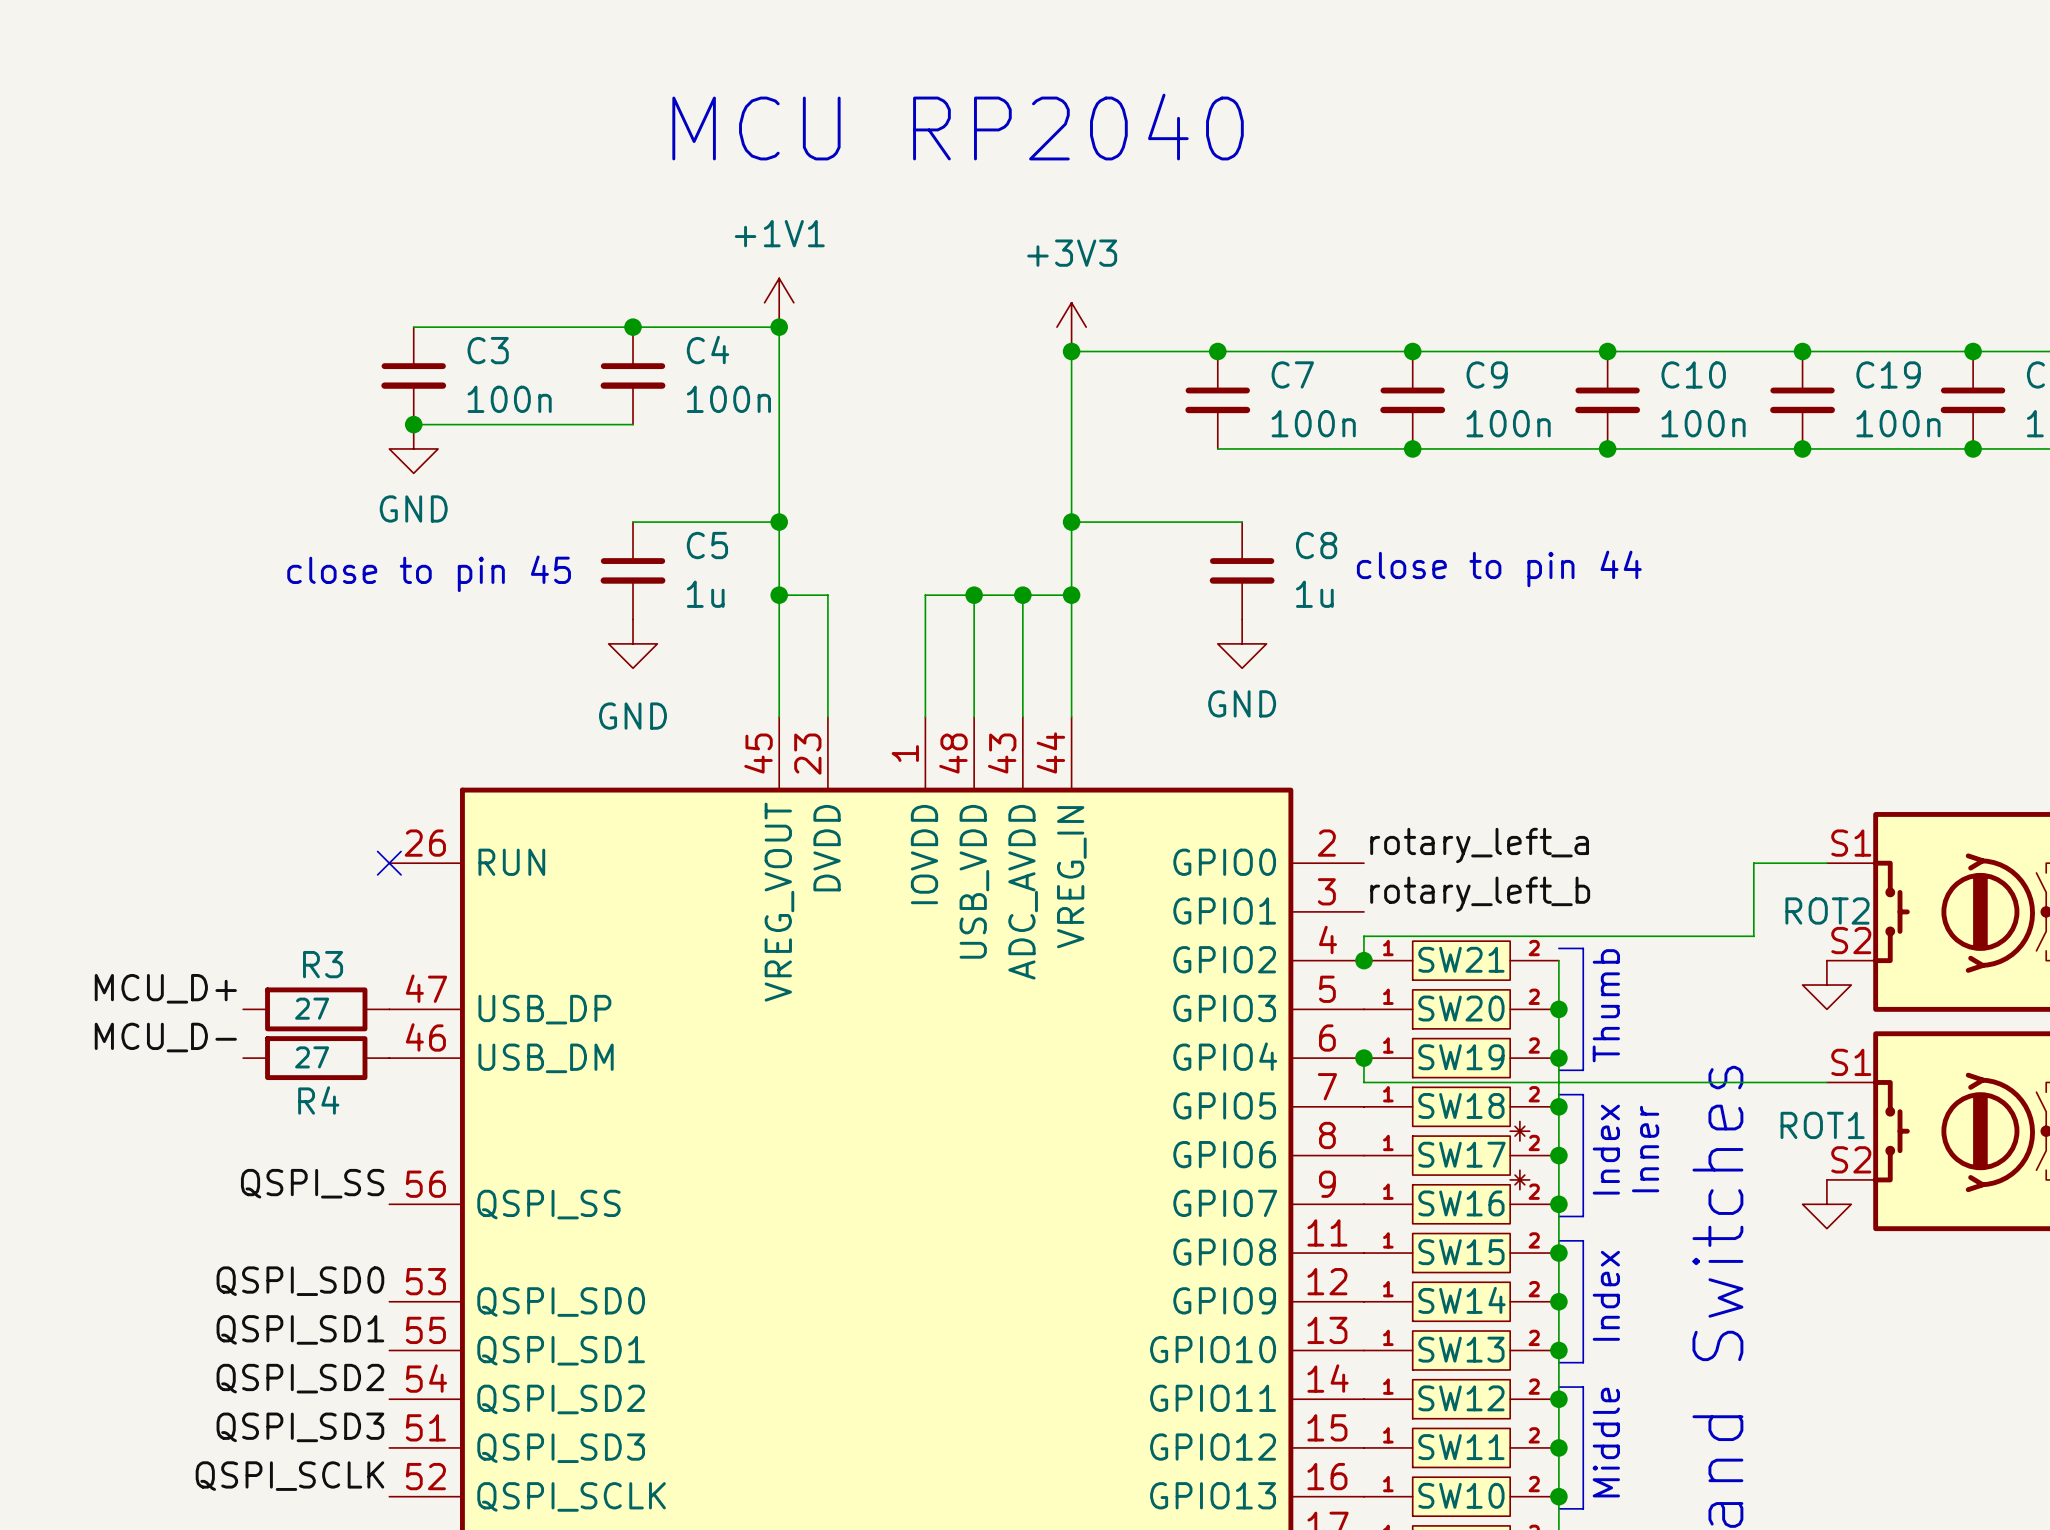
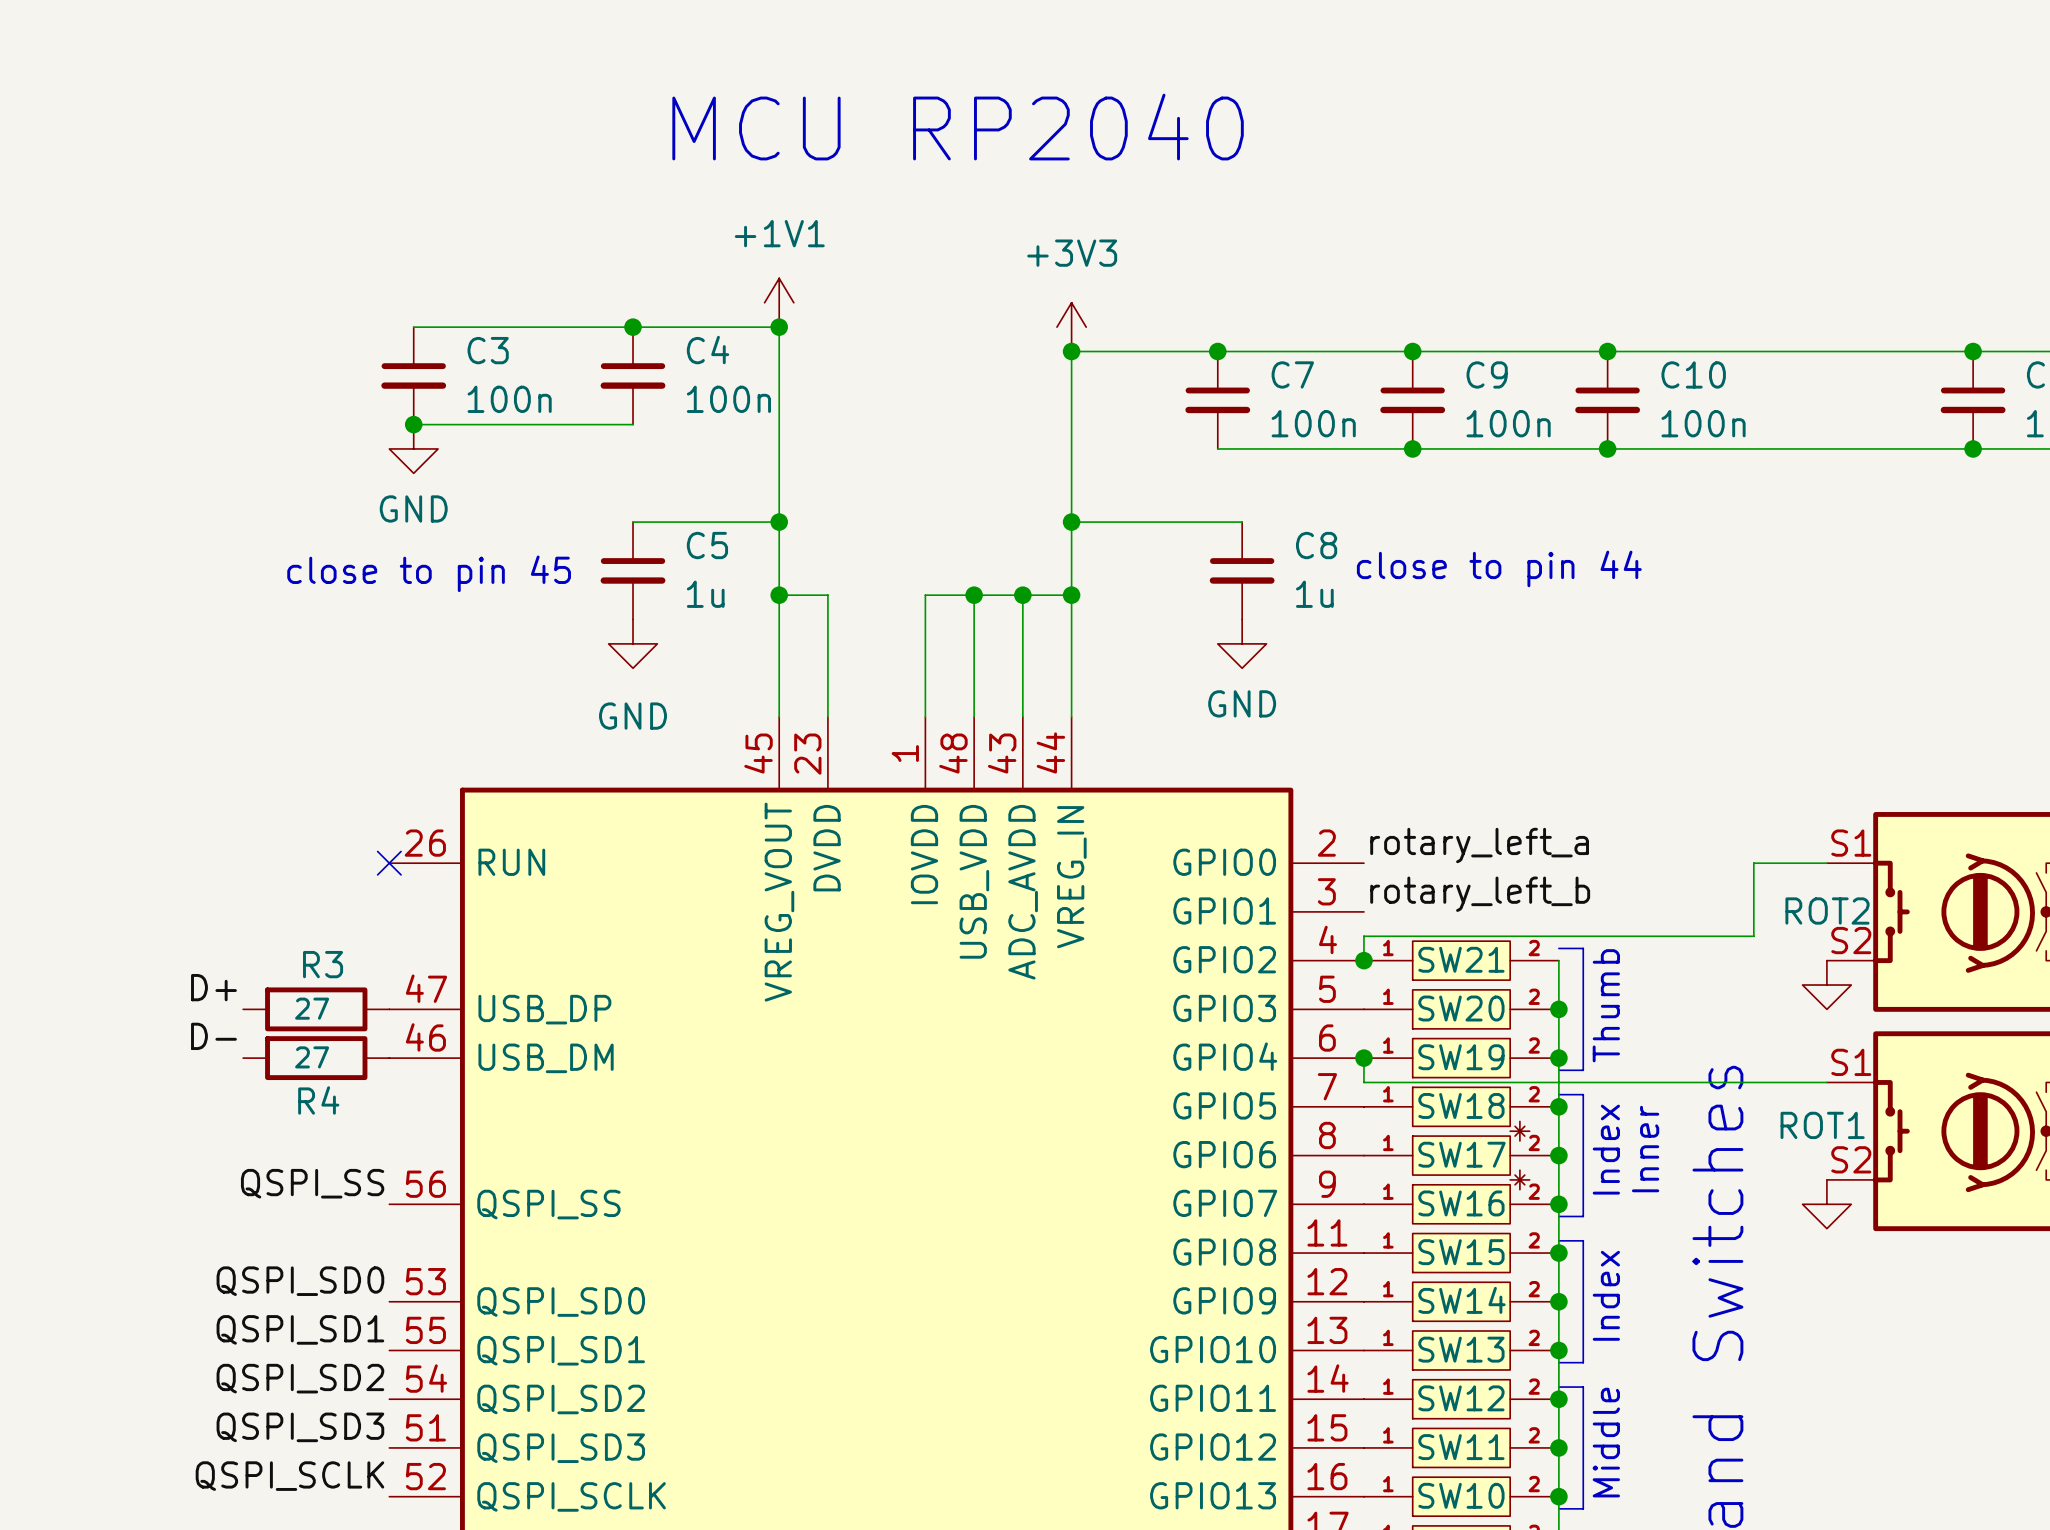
junction: (1802, 351) -> none
C19: 100n (1802, 400) -> none
junction: (1802, 448) -> none
label: MCU_D+ (165, 988) -> D+ (213, 987)
label: MCU_D- (165, 1037) -> D- (213, 1036)

